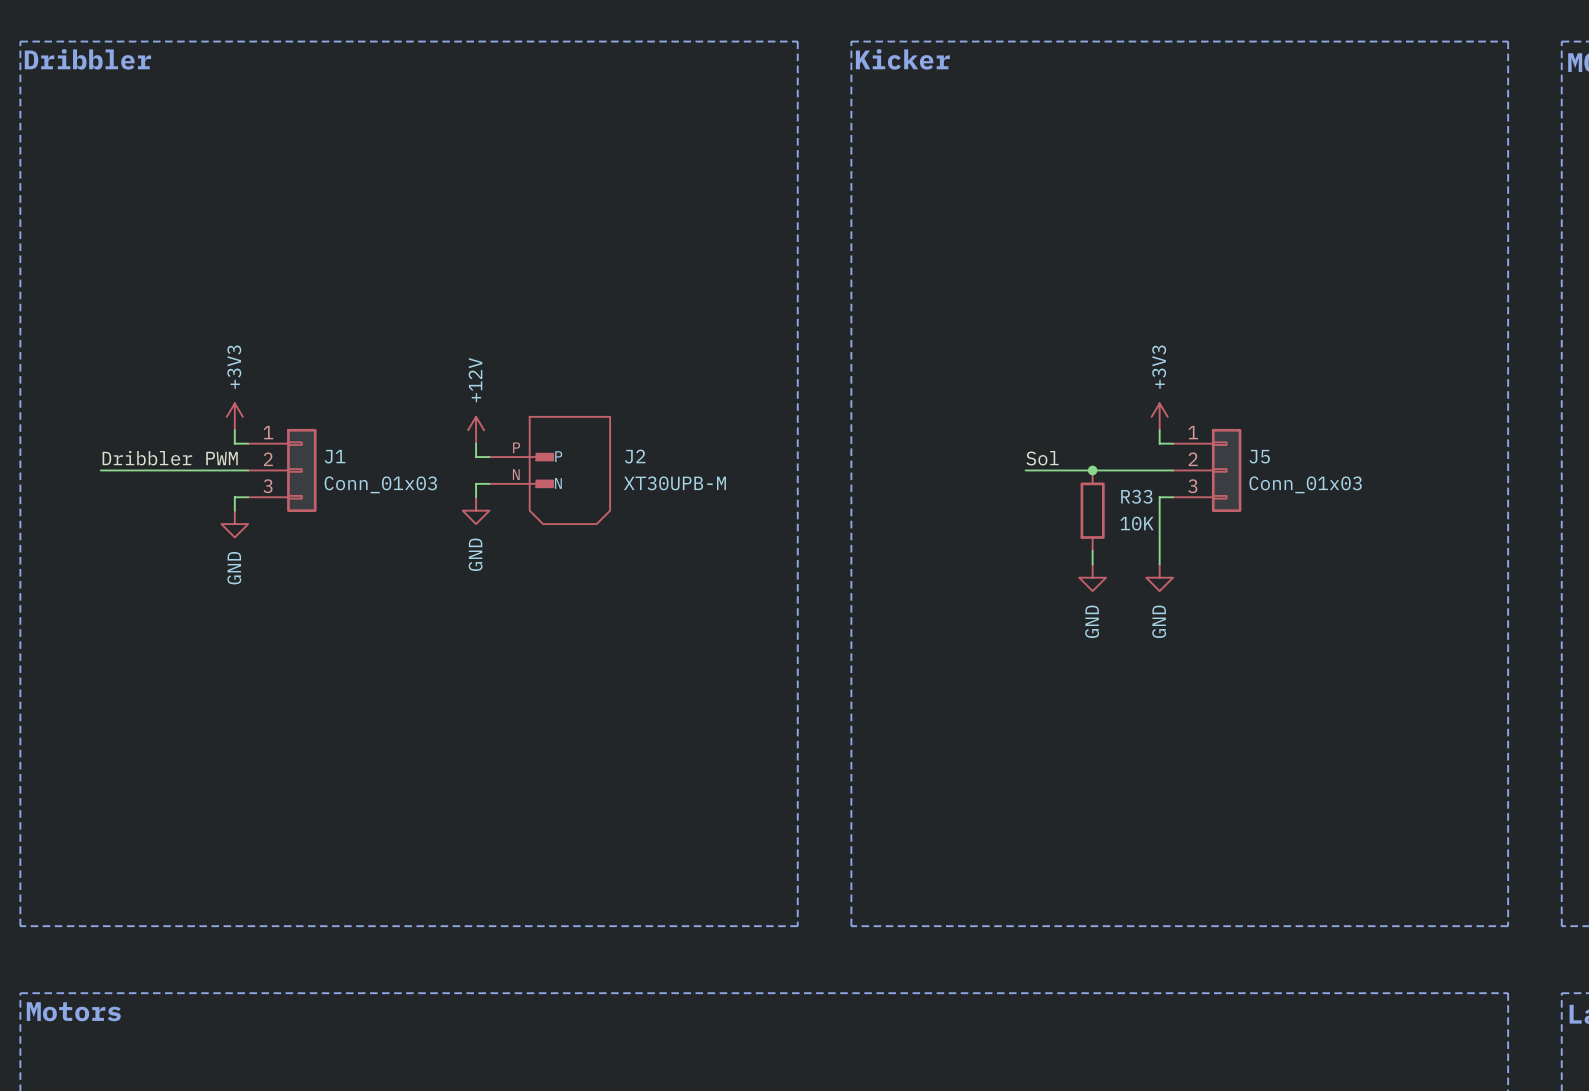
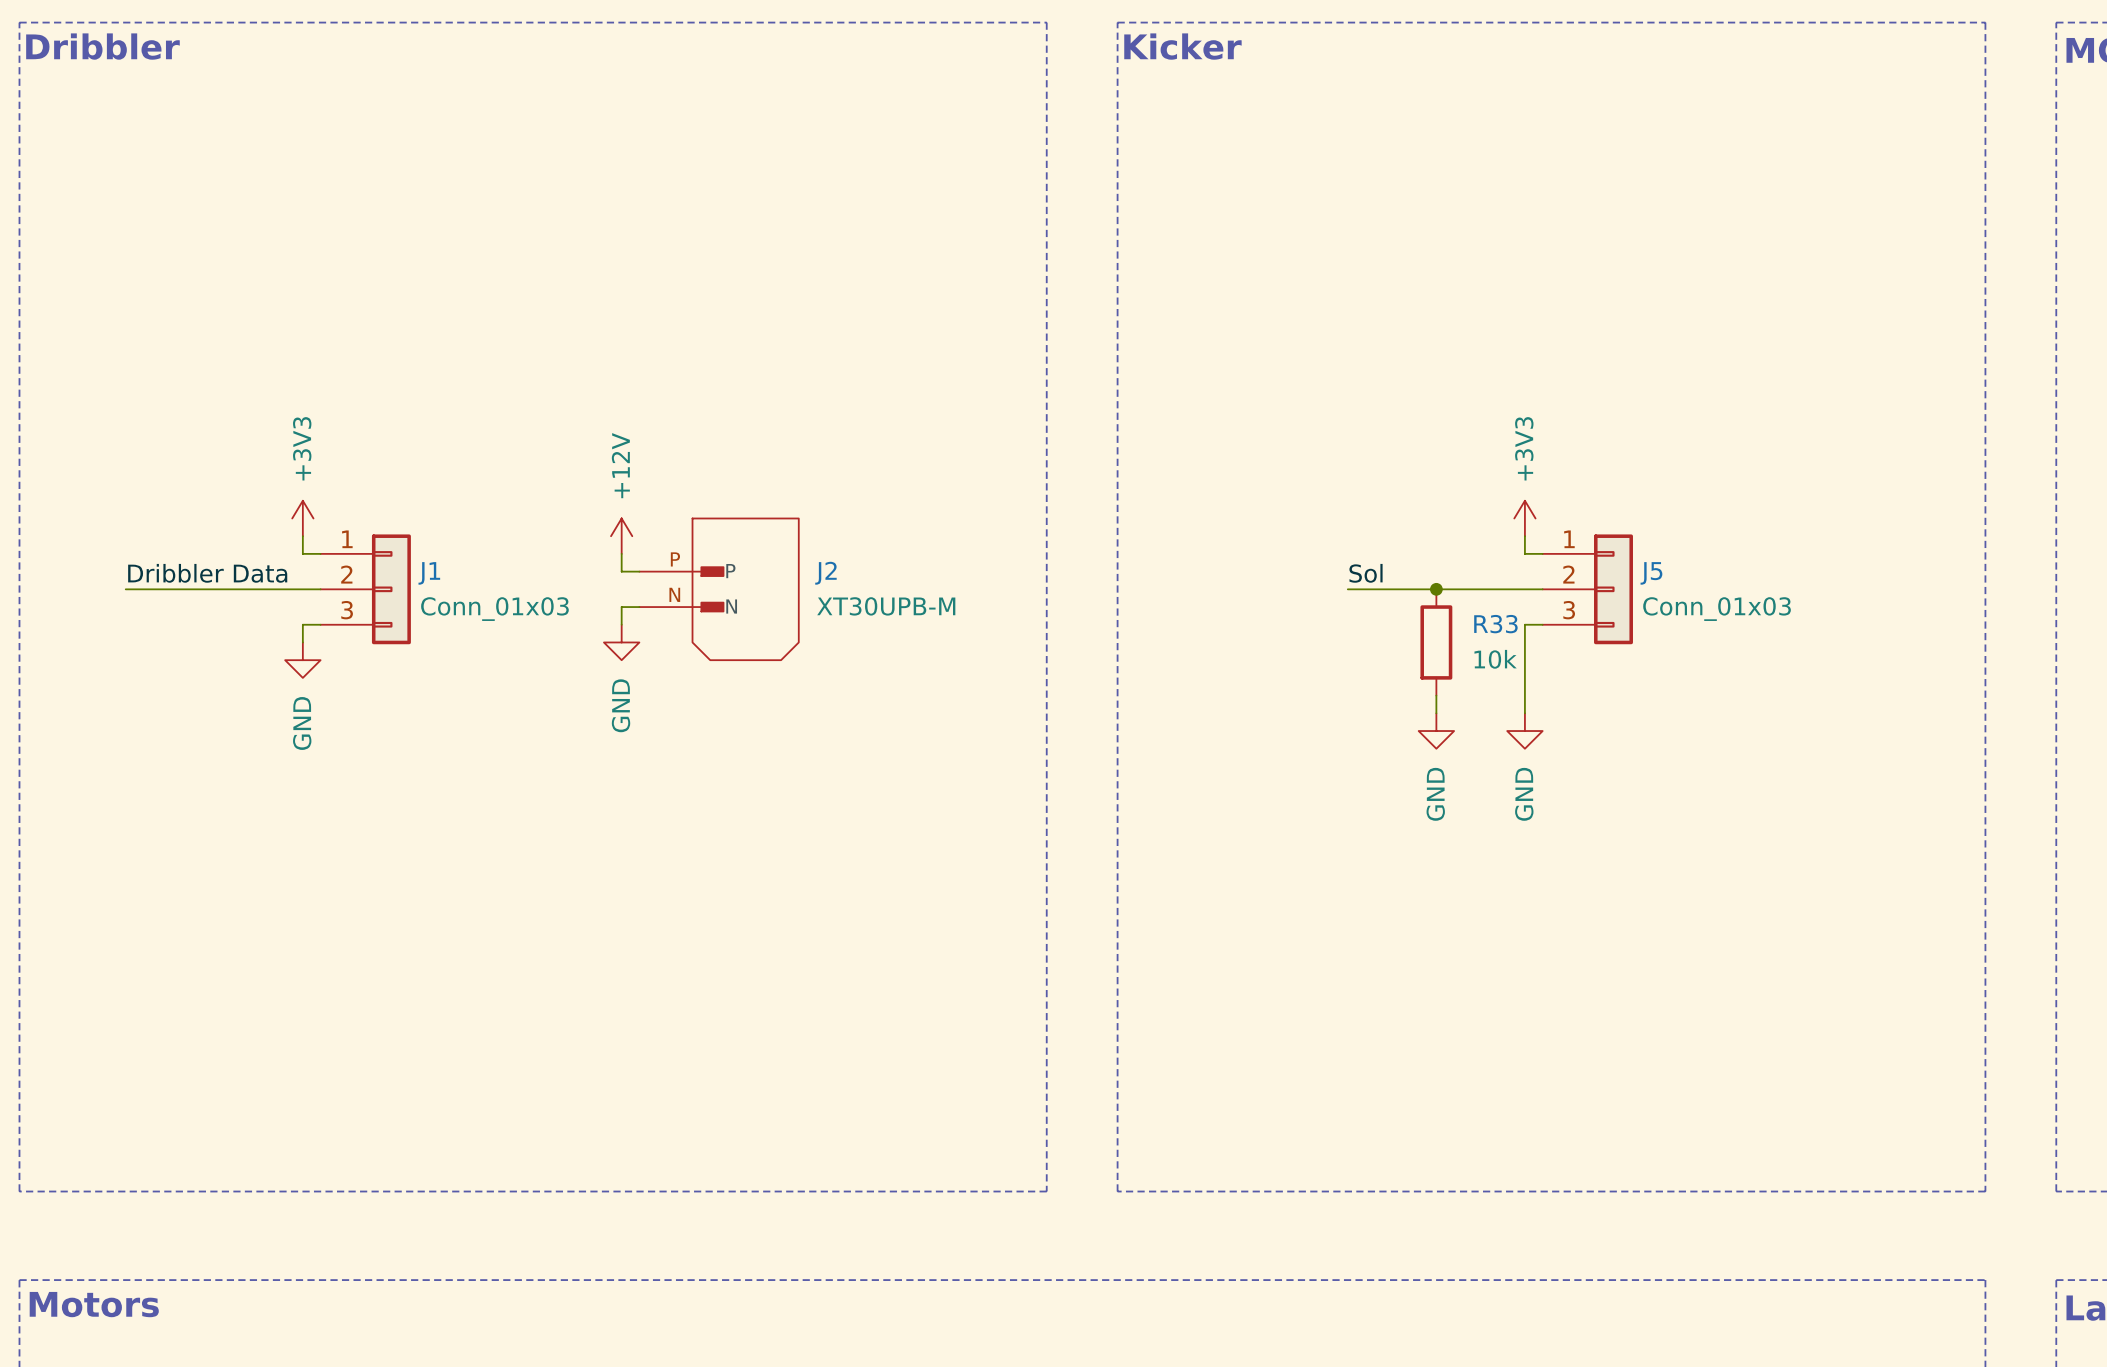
label: Dribbler PWM (170, 458) -> Dribbler Data (207, 573)
R33 value: 10K (1137, 523) -> 10k (1495, 659)

